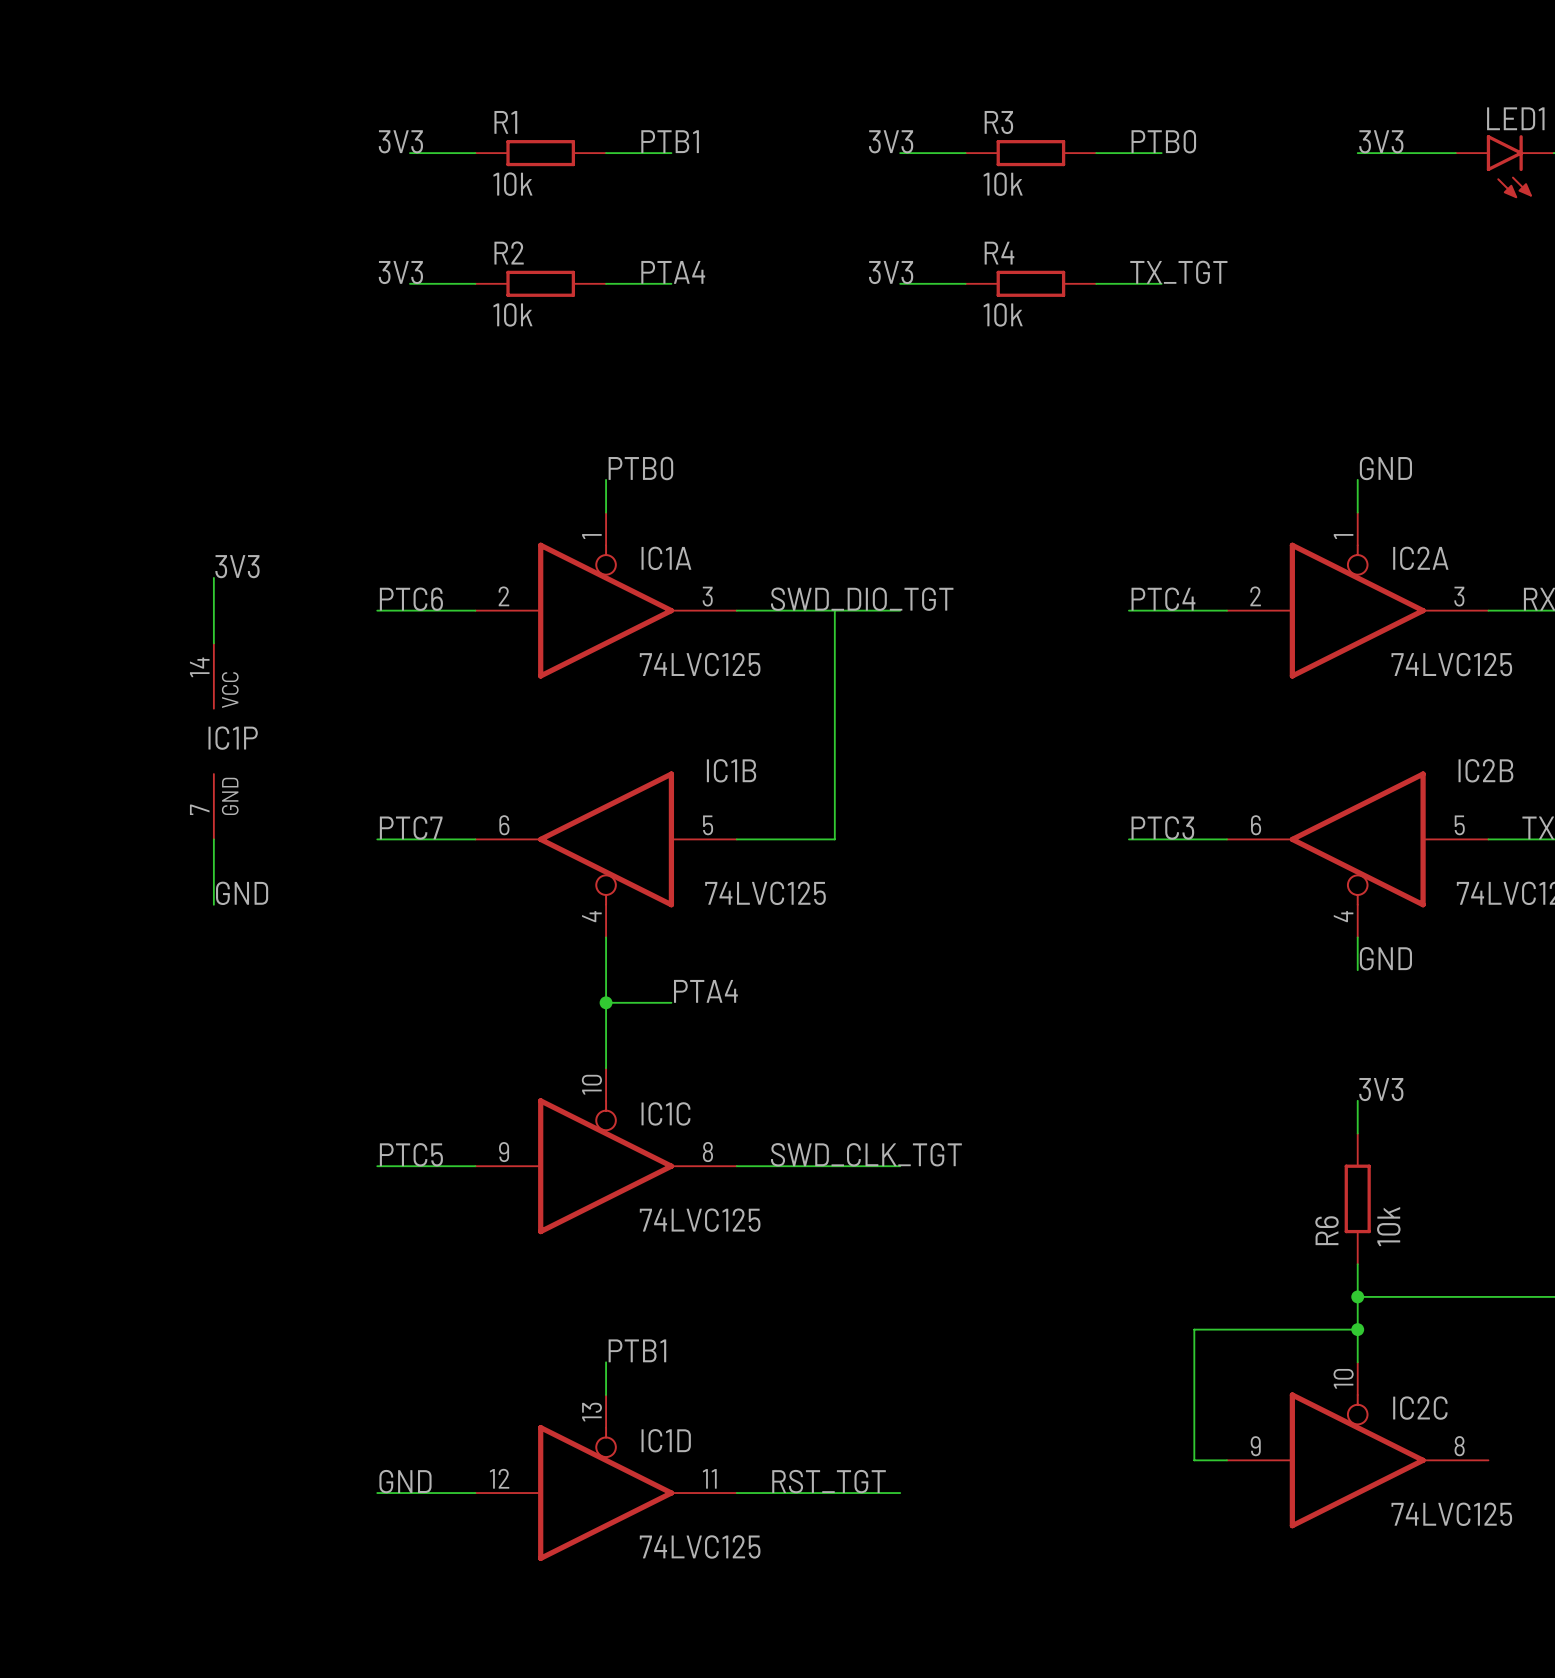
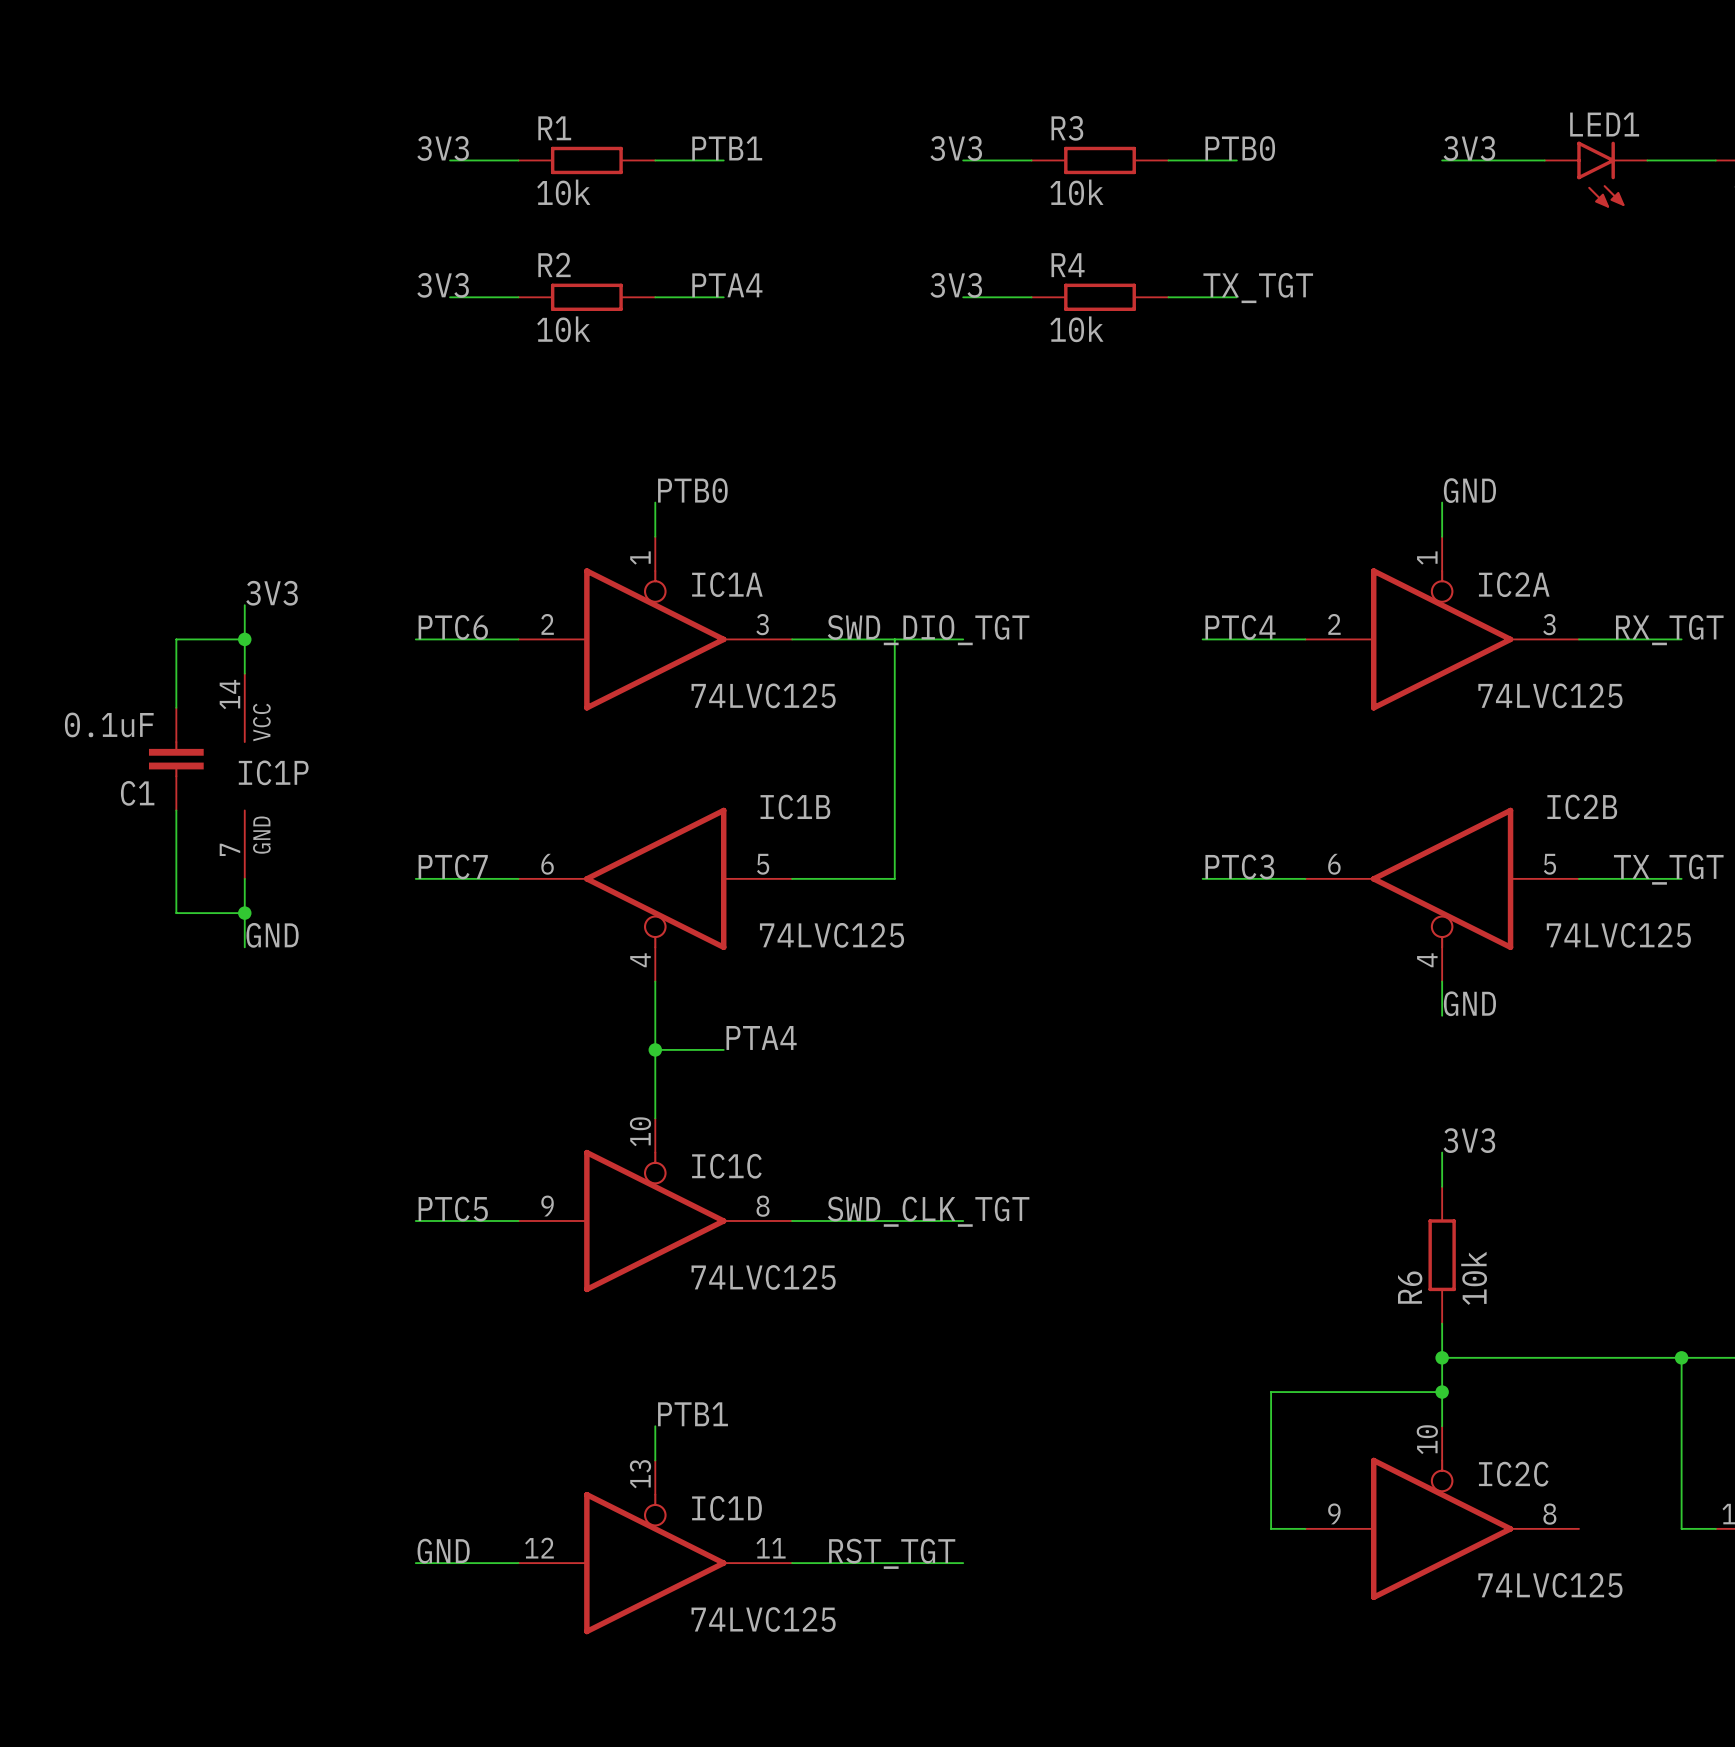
wire: none -> (244, 639) (176, 639) (176, 707)
junction: none -> (244, 639)
C1: none -> 0.1uF (176, 759)
wire: none -> (176, 810) (176, 913) (244, 913)
junction: none -> (244, 913)

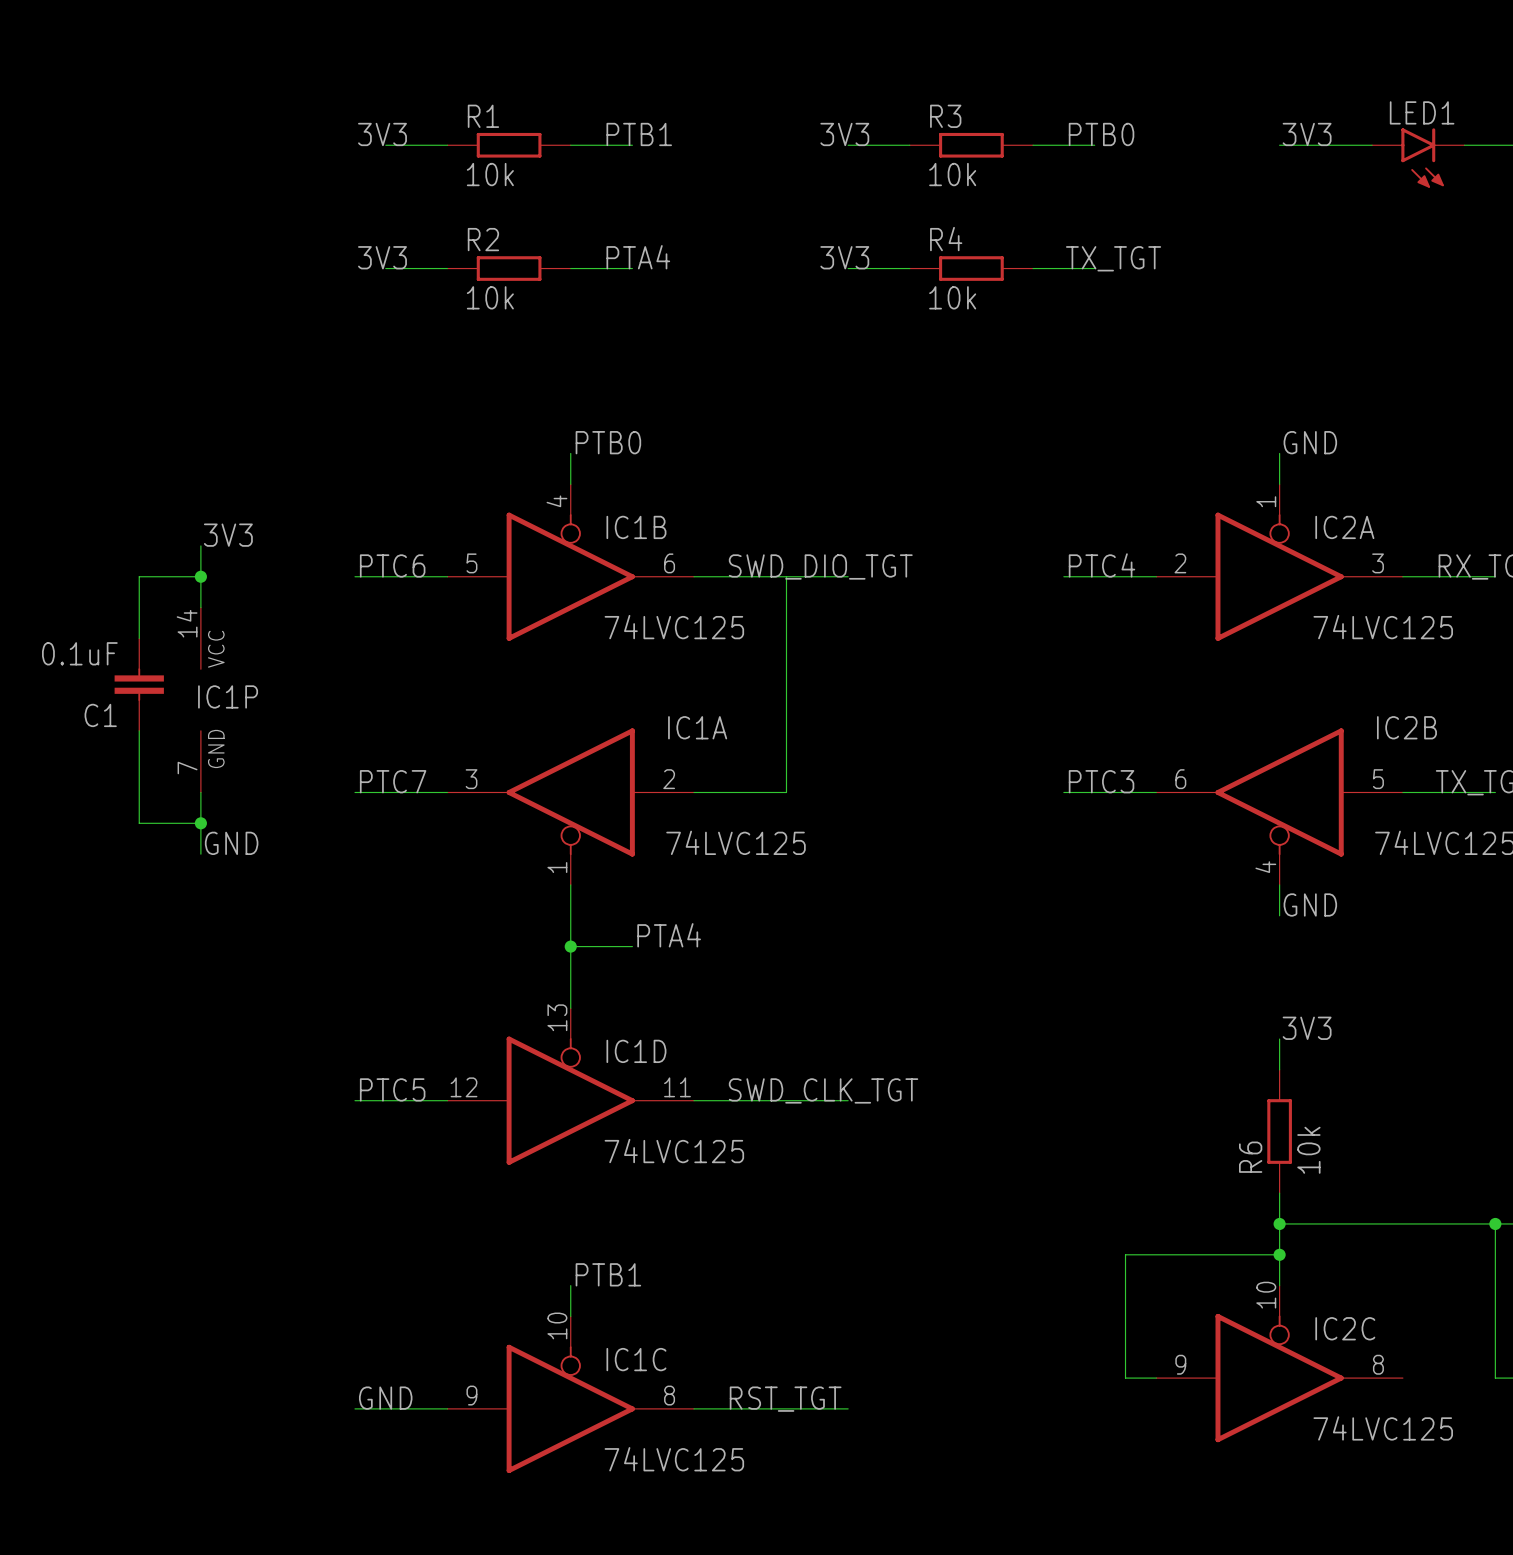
IC1A name position: IC1A (727, 584) -> IC1A (697, 727)
IC1A position: (655, 623) -> (570, 806)
IC1A rotation: 0° (655, 639) -> 180° (570, 792)
IC1B name position: IC1B (795, 807) -> IC1B (636, 527)
IC1B rotation: 0° (655, 878) -> 180° (570, 576)
IC1B position: (655, 894) -> (570, 562)
IC1C position: (655, 1205) -> (570, 1394)
IC1D position: (655, 1547) -> (570, 1086)

